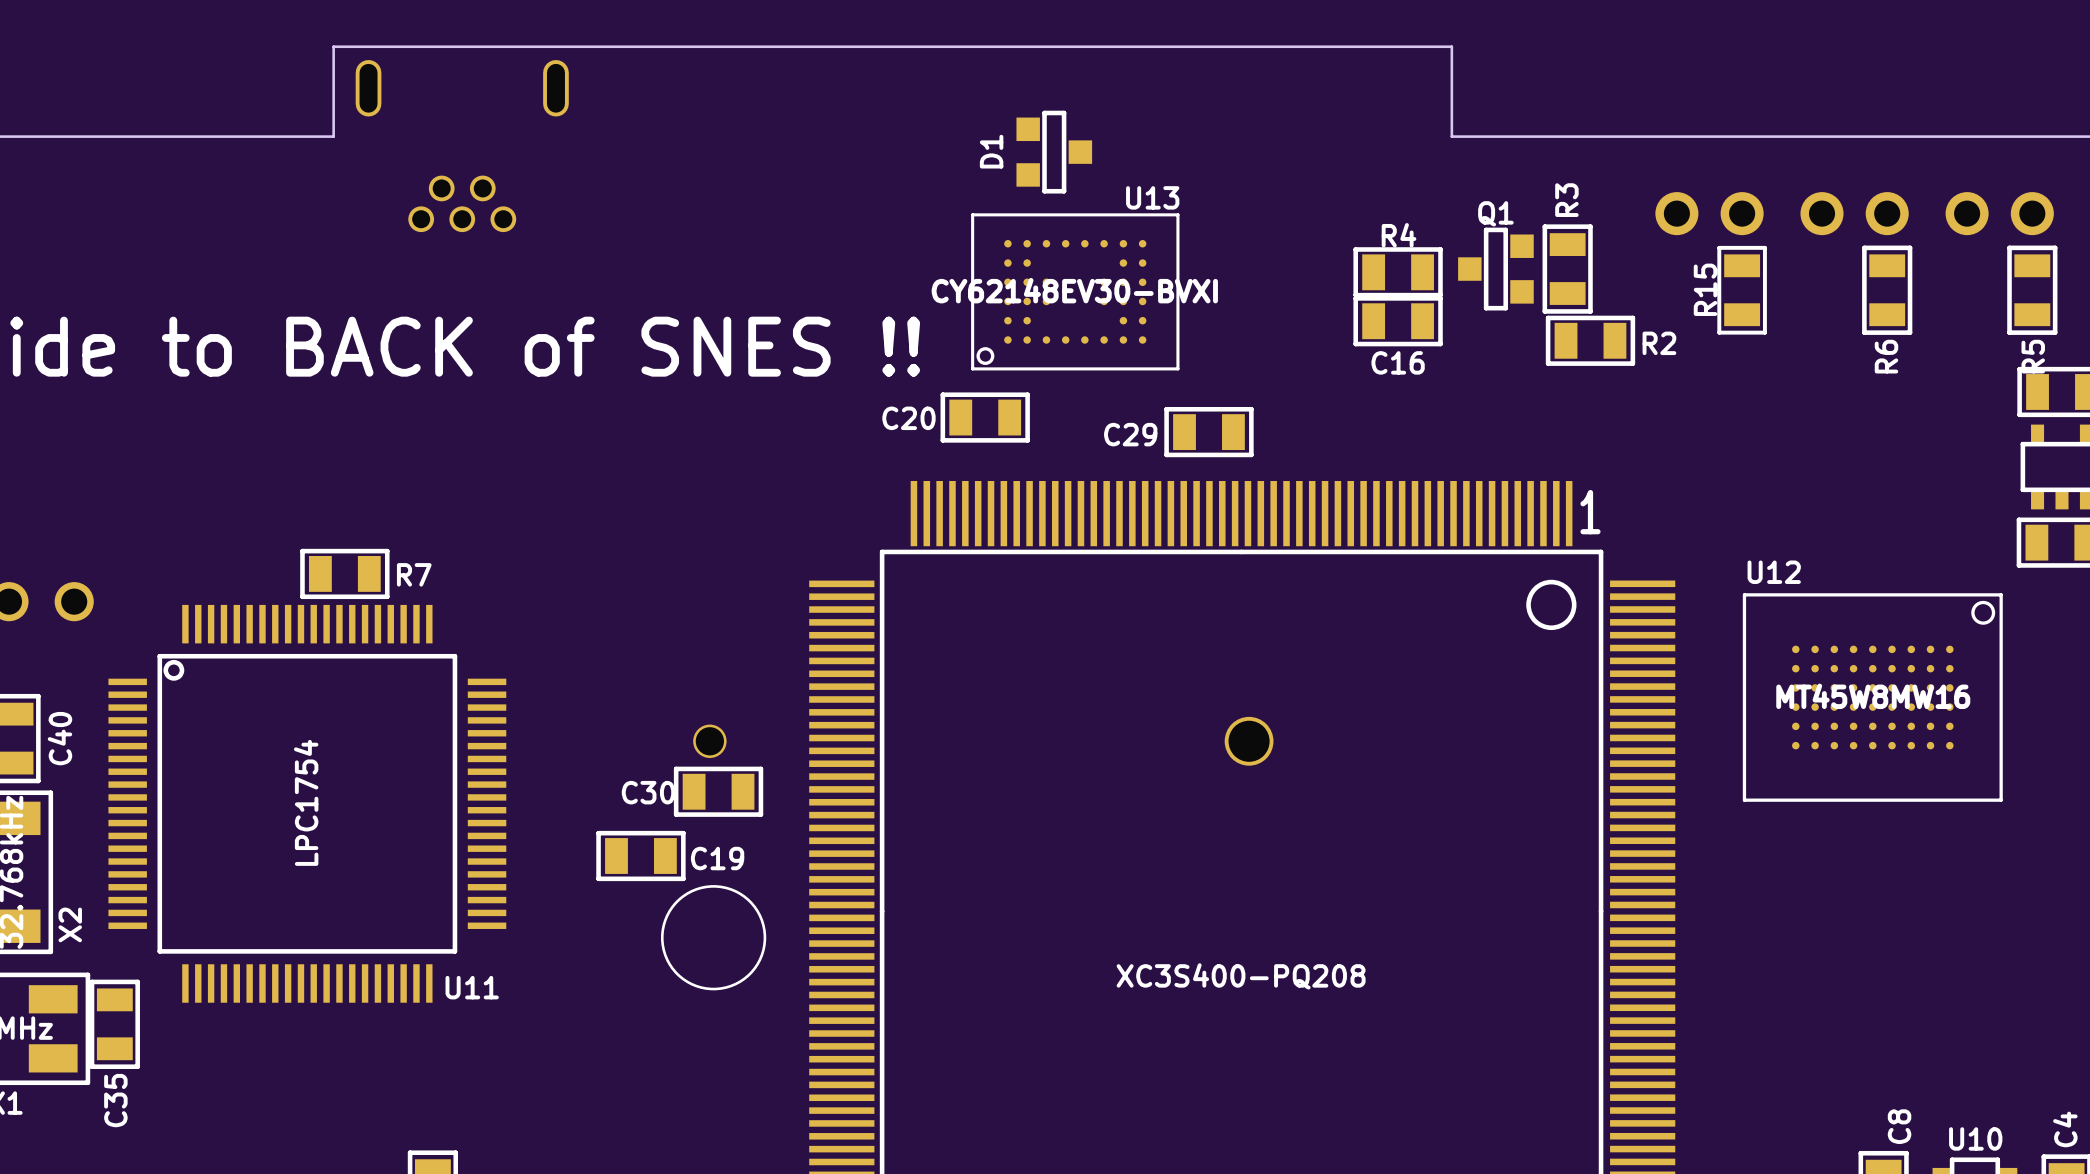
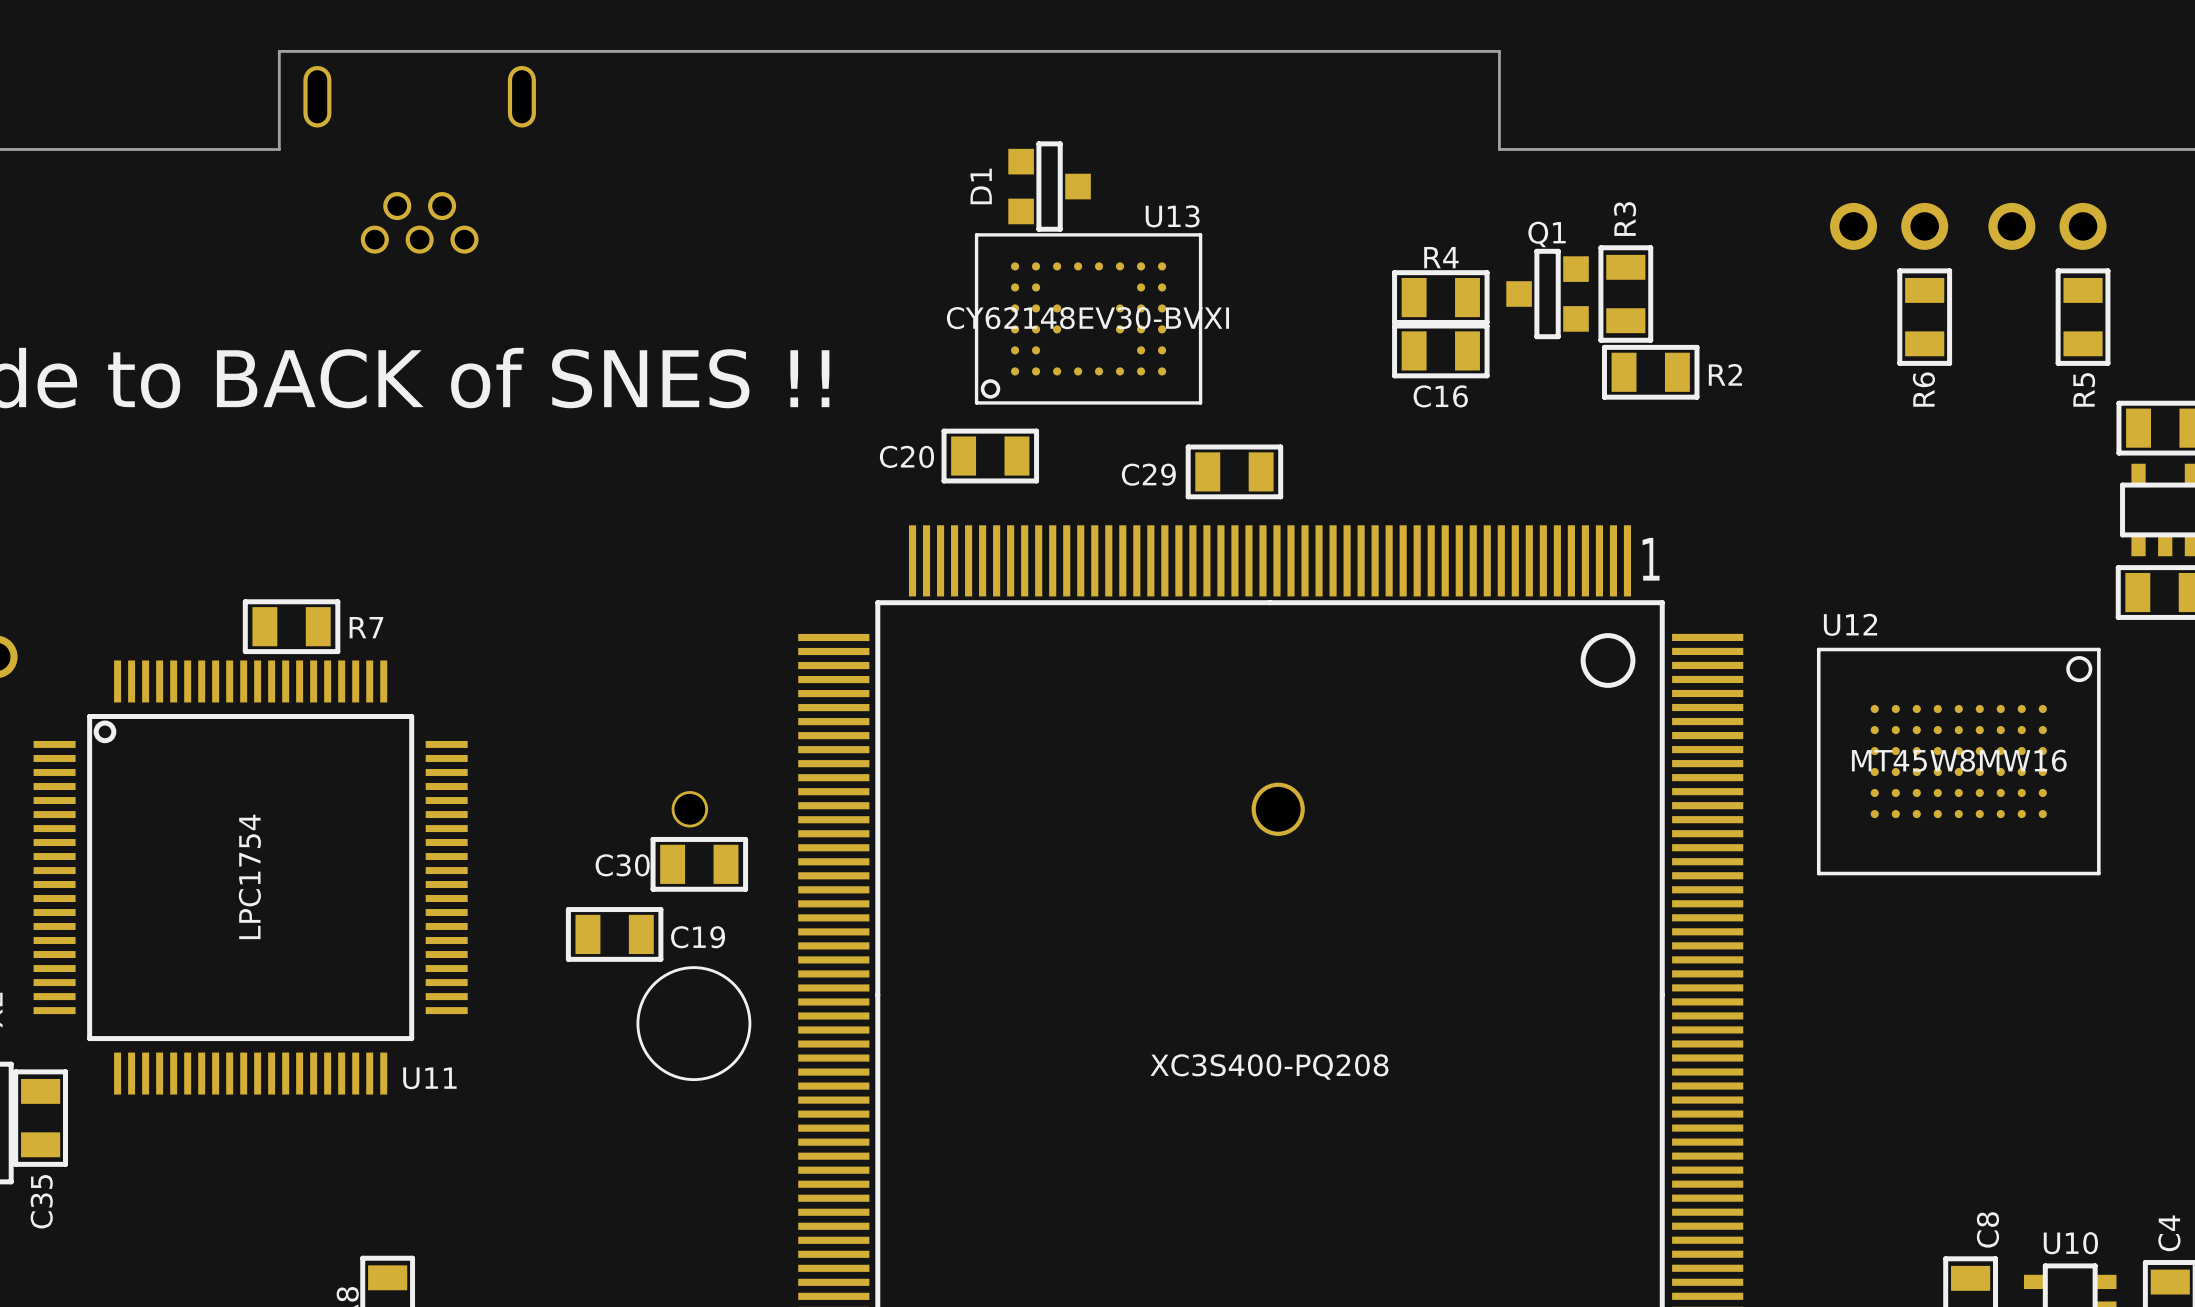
D1 position: (1054, 152) -> (1049, 186)
part: (1709, 213) -> none
part position: (1854, 213) -> (1889, 226)
part position: (1999, 213) -> (2047, 226)
R15: (1742, 290) -> none
R6 position: (1887, 290) -> (1924, 317)
R5 position: (2032, 290) -> (2083, 317)

